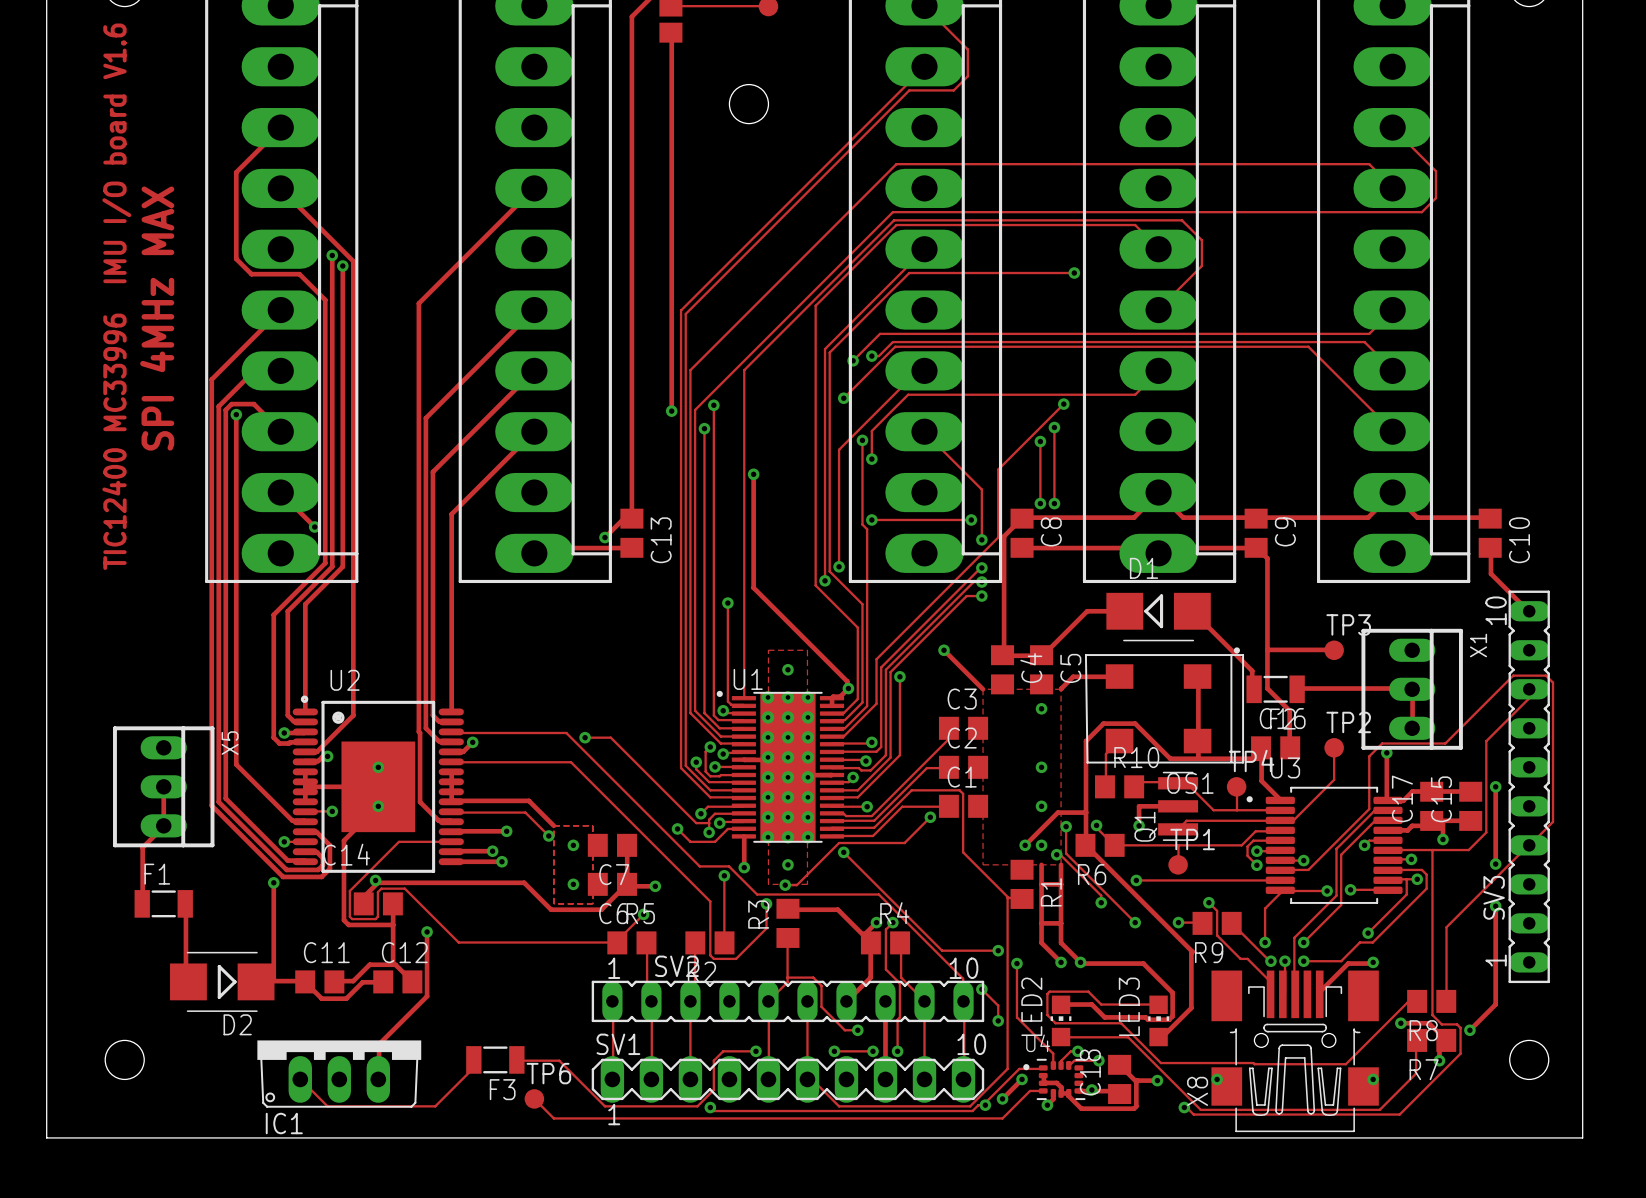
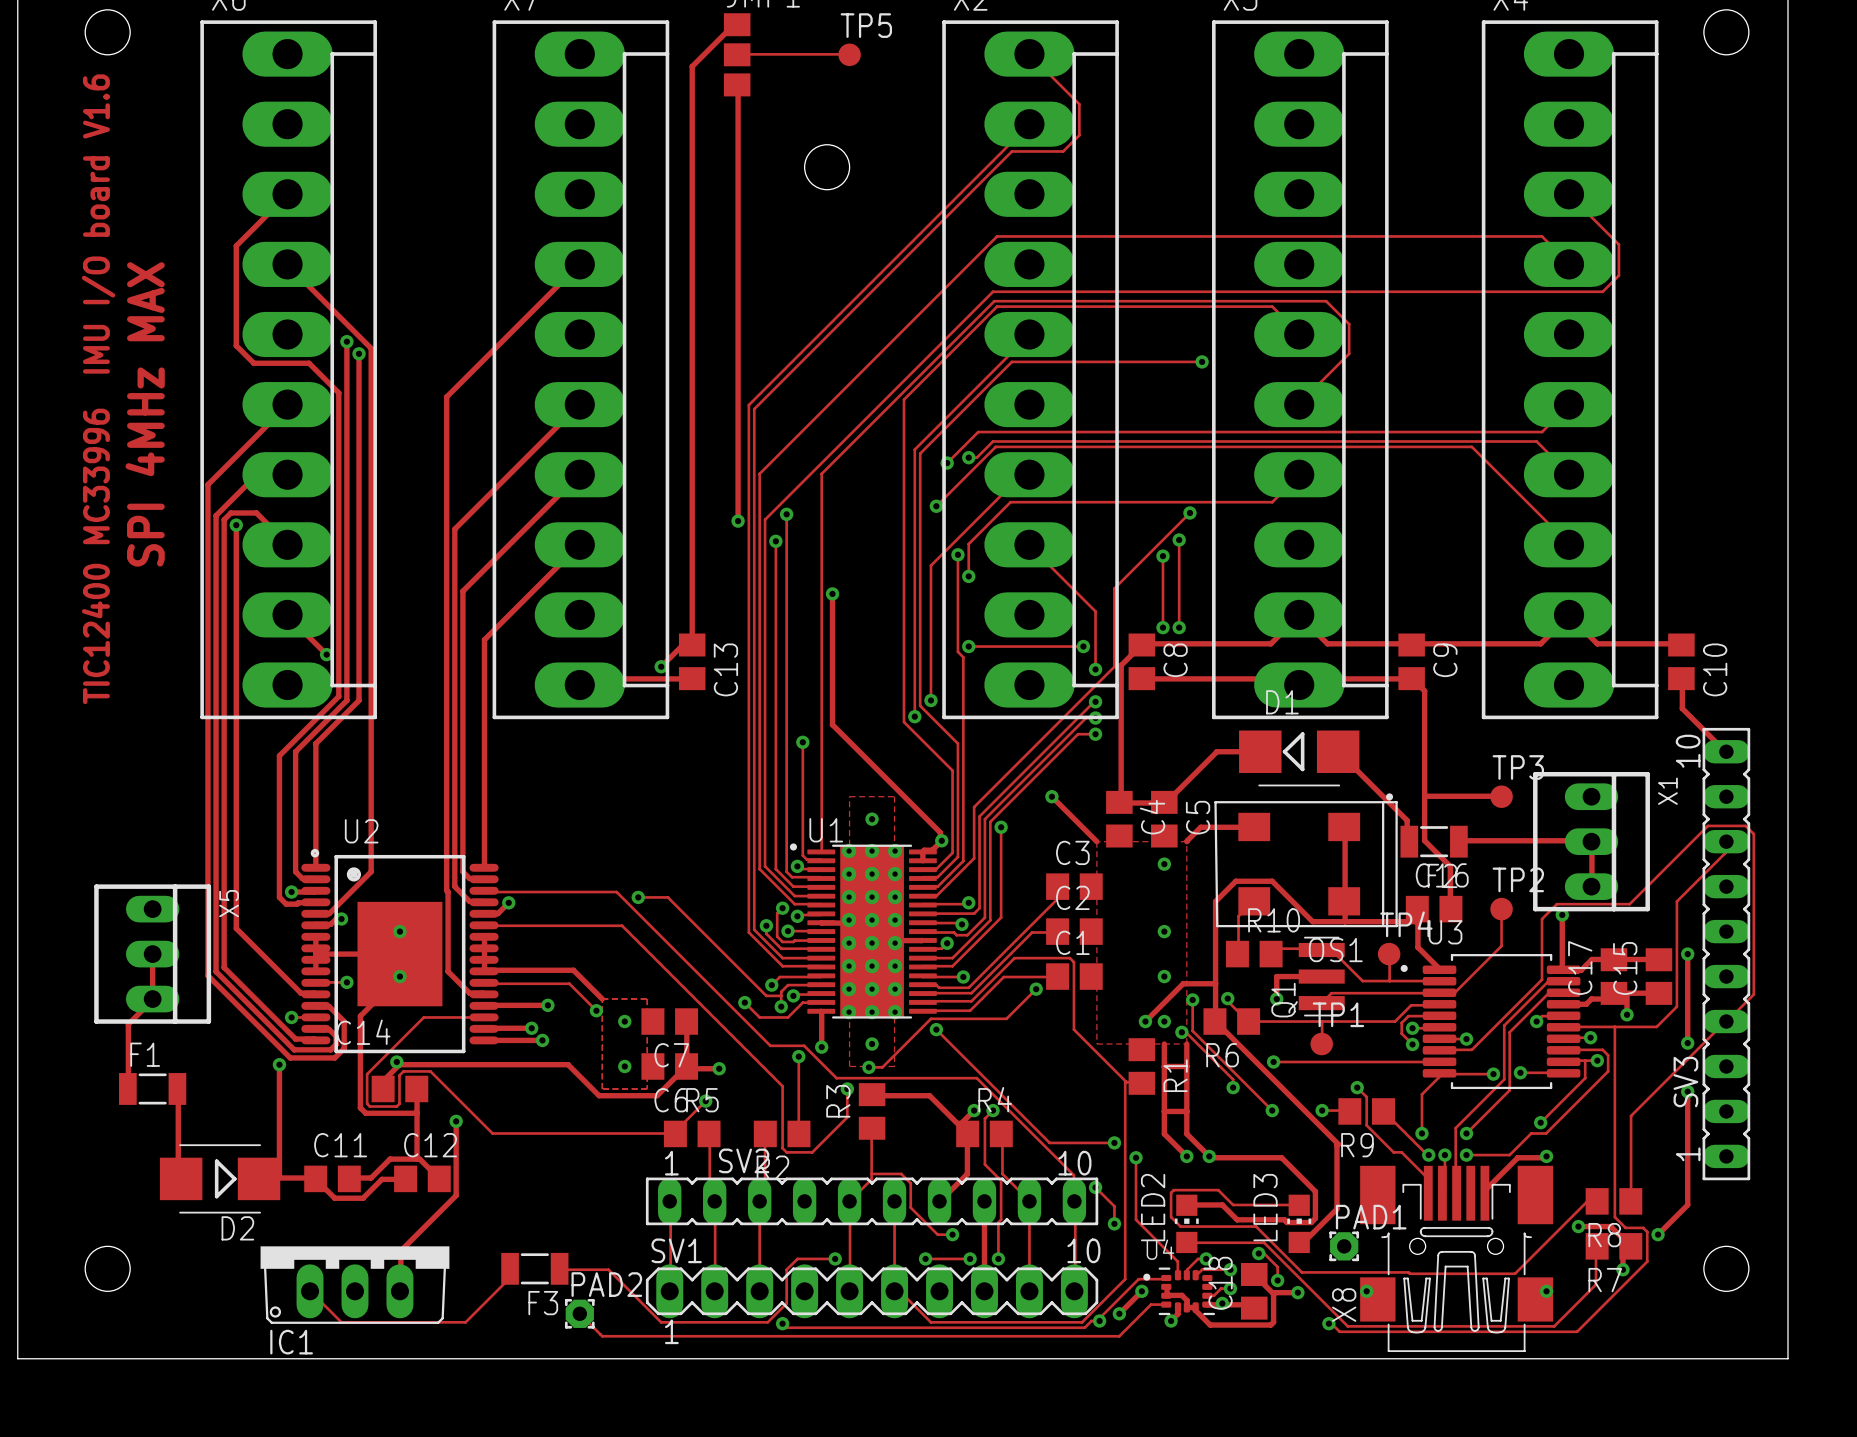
PAD1: none -> (1344, 1246)
track: none -> (1258, 1253) (1264, 1253) (1277, 1267) (1277, 1280)
via: none -> (1258, 1253)
via: none -> (1277, 1280)
track: none -> (1230, 1288) (1220, 1288) (1214, 1295) (1207, 1295)
via: none -> (1230, 1288)
TP6: (534, 1098) -> none
PAD2: none -> (579, 1313)

